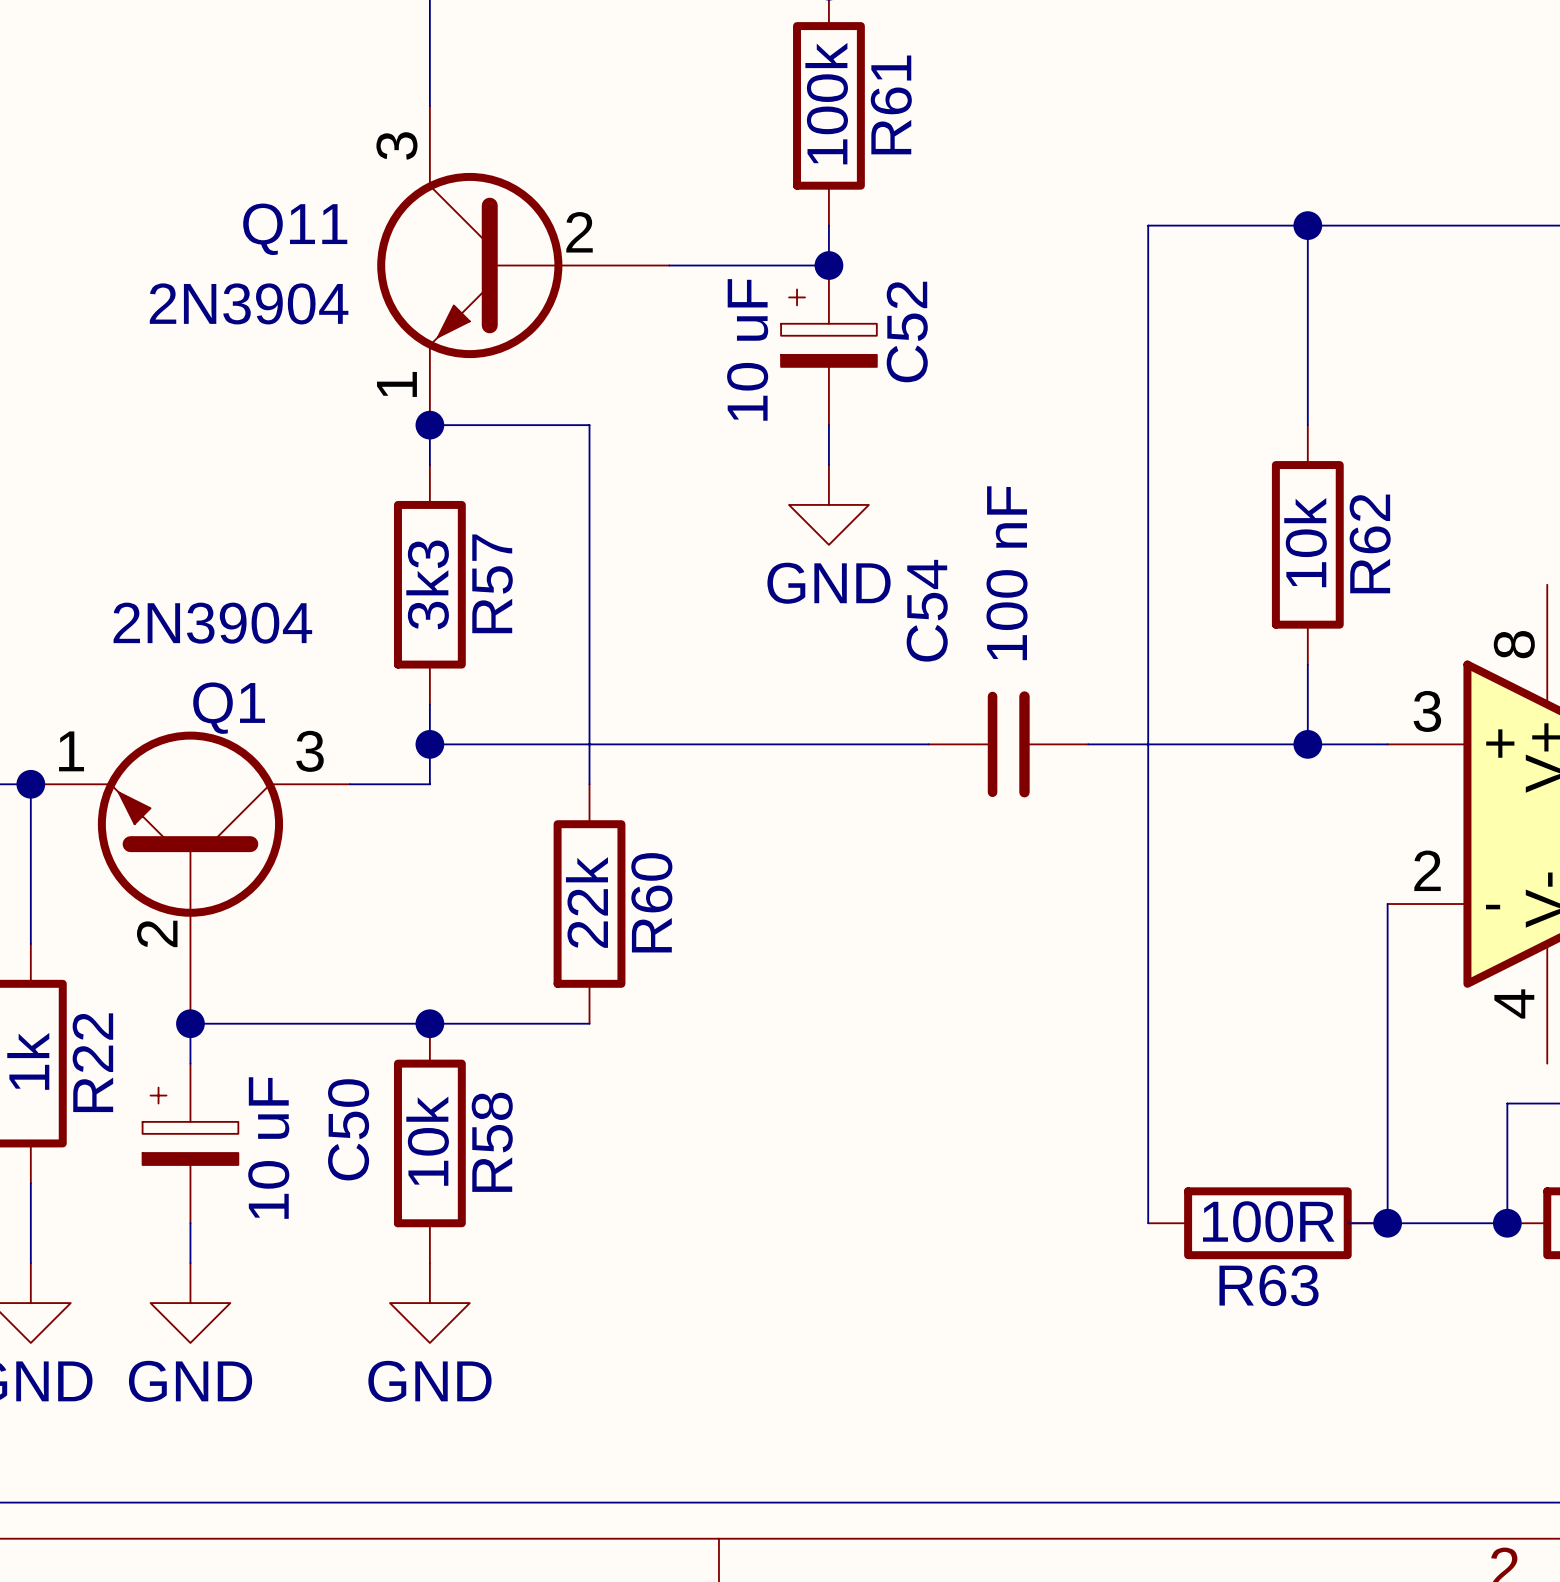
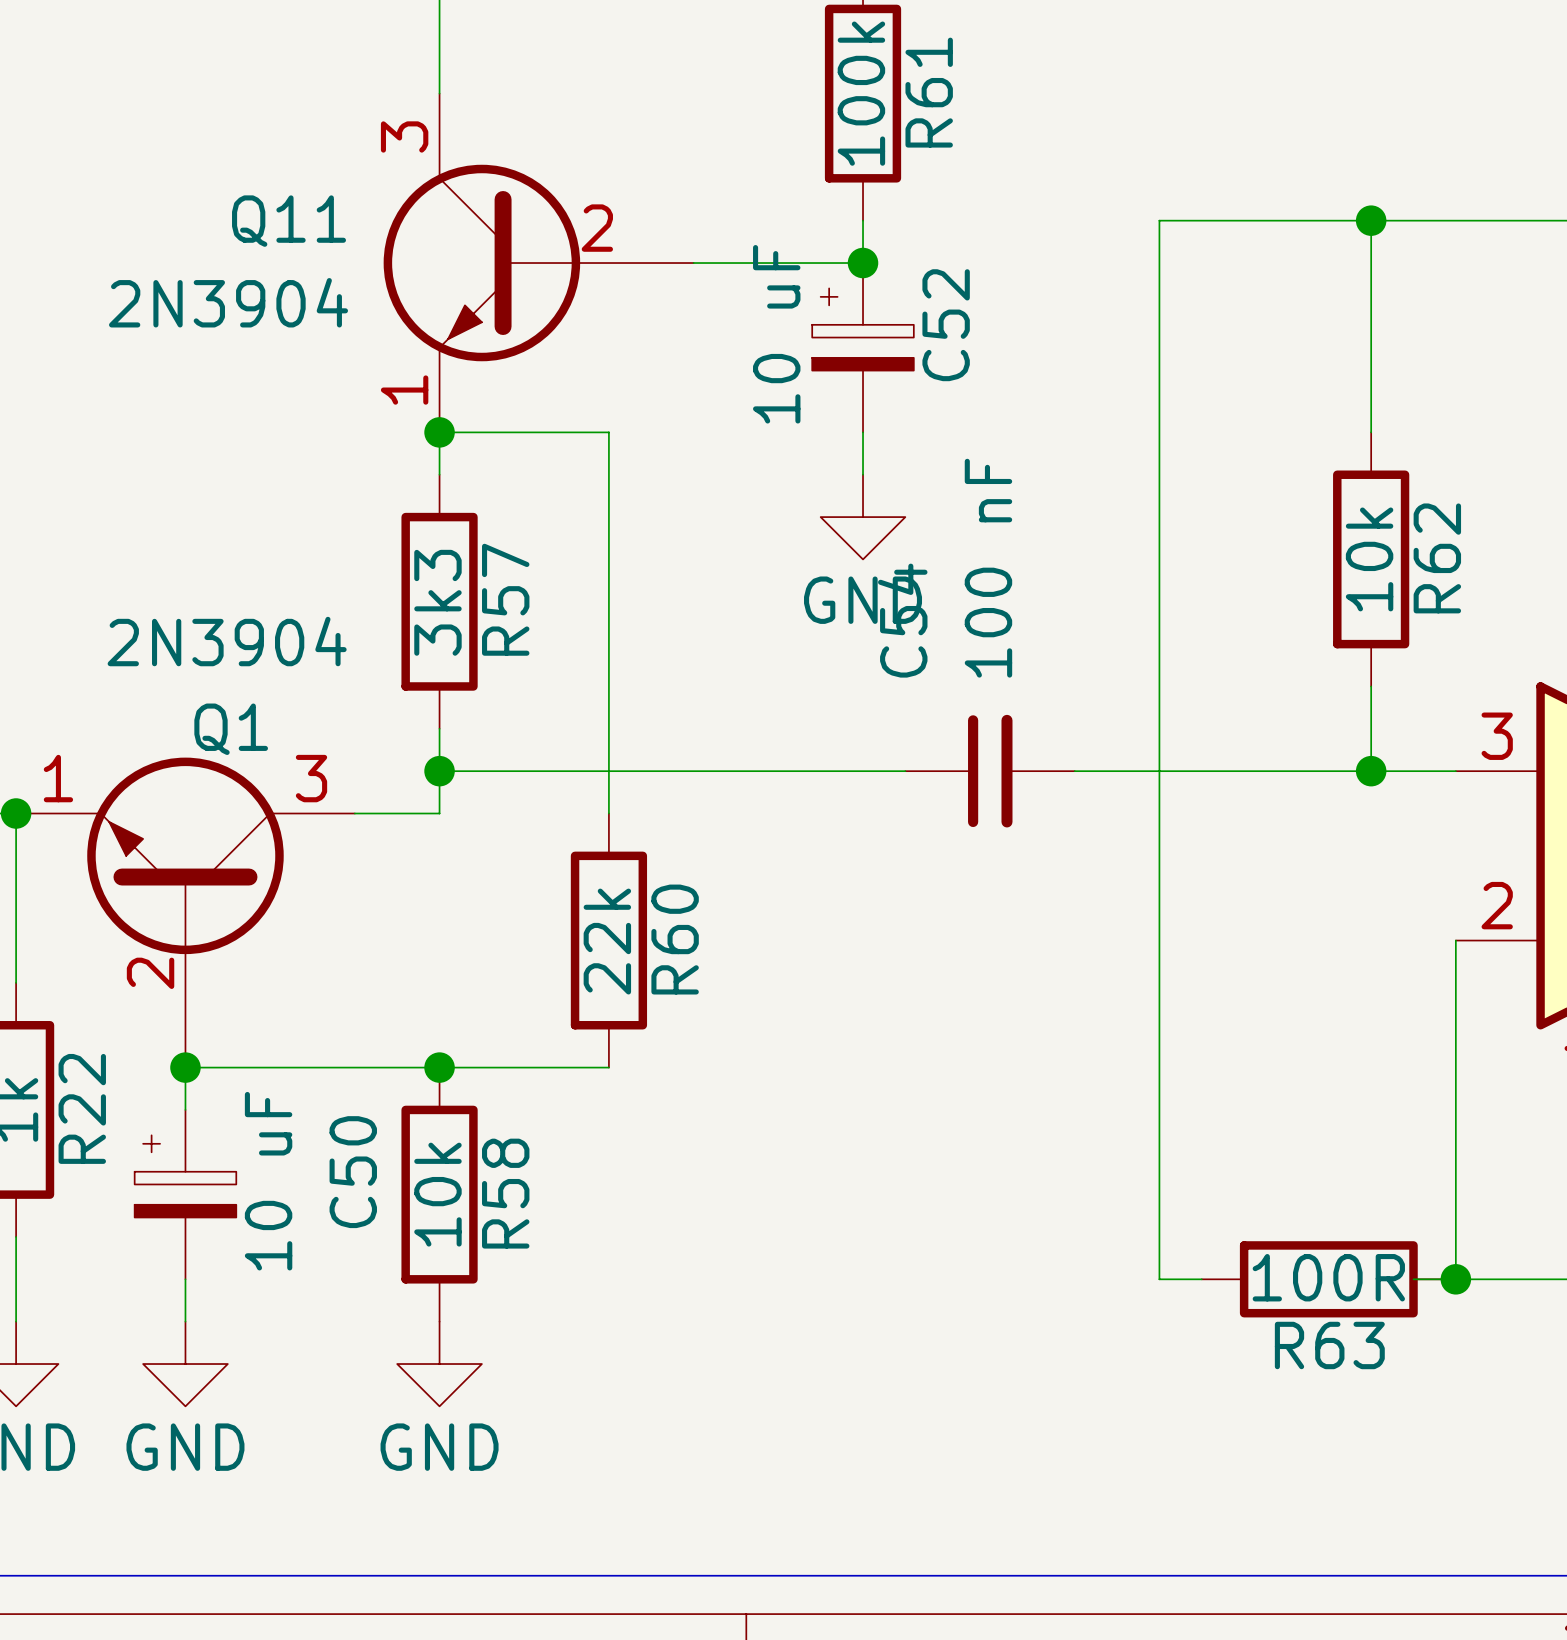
wire: (1148, 225) (1148, 1223) -> (1201, 220) (1159, 220) (1159, 1279) (1201, 1279)
C54 position: (1008, 744) -> (990, 771)

